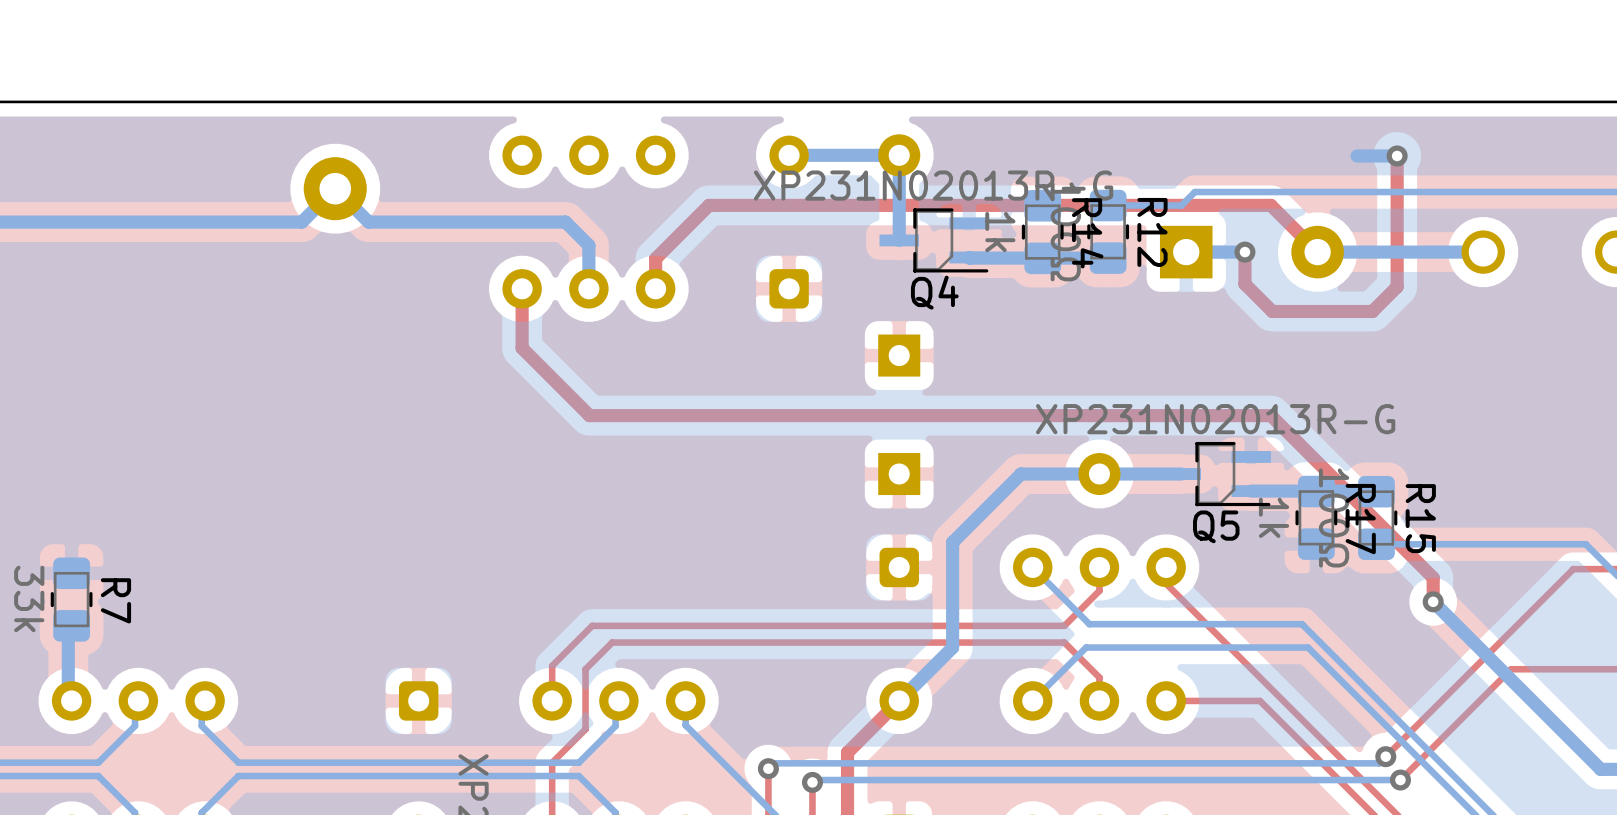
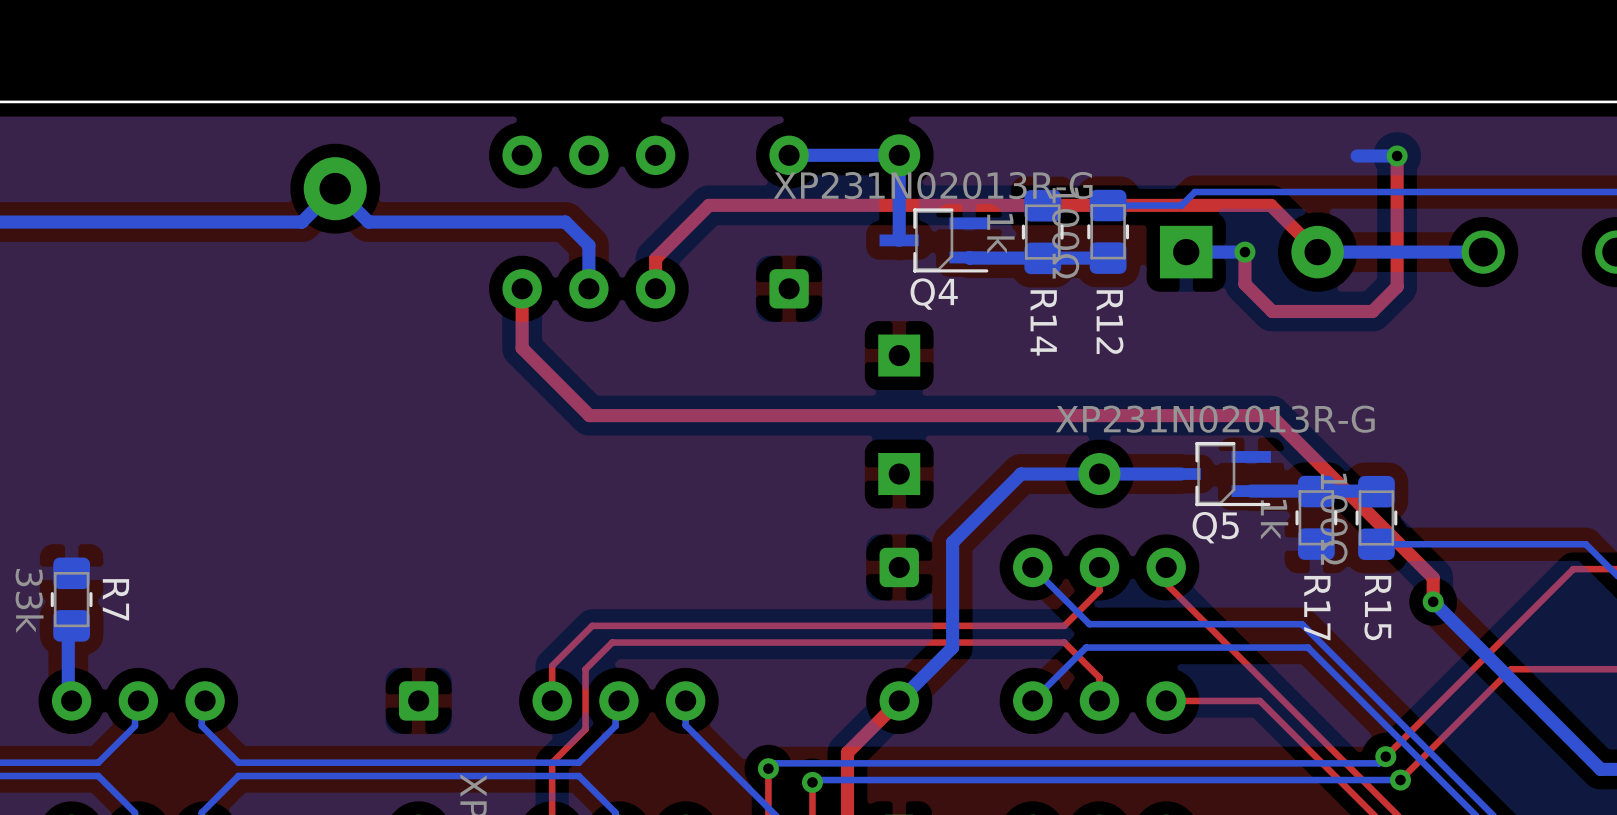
R12 name position: R12 (1152, 232) -> R12 (1110, 322)
R14 name position: R14 (1087, 233) -> R14 (1043, 322)
R15 name position: R15 (1420, 518) -> R15 (1377, 608)
R17 name position: R17 (1360, 519) -> R17 (1317, 608)

